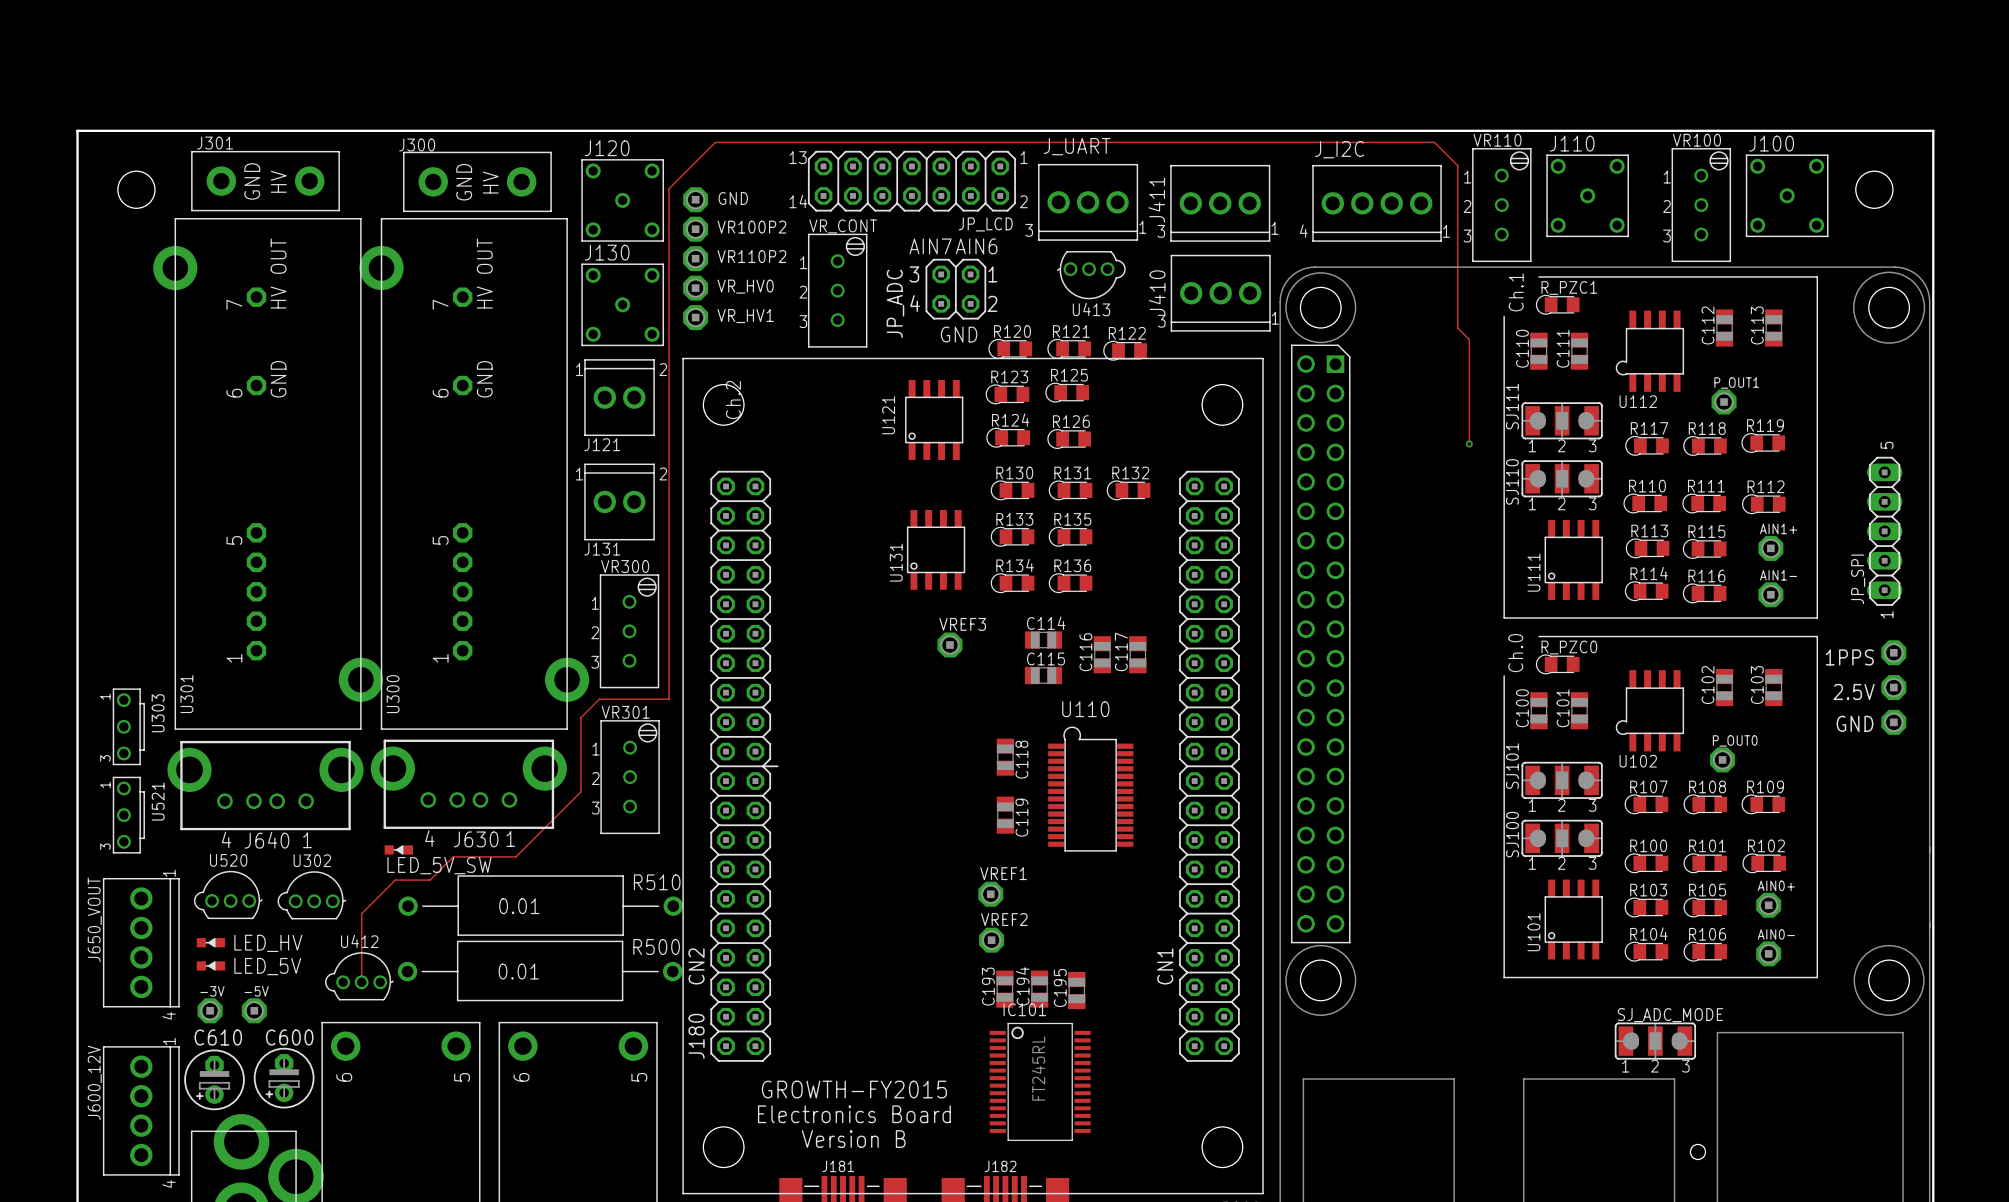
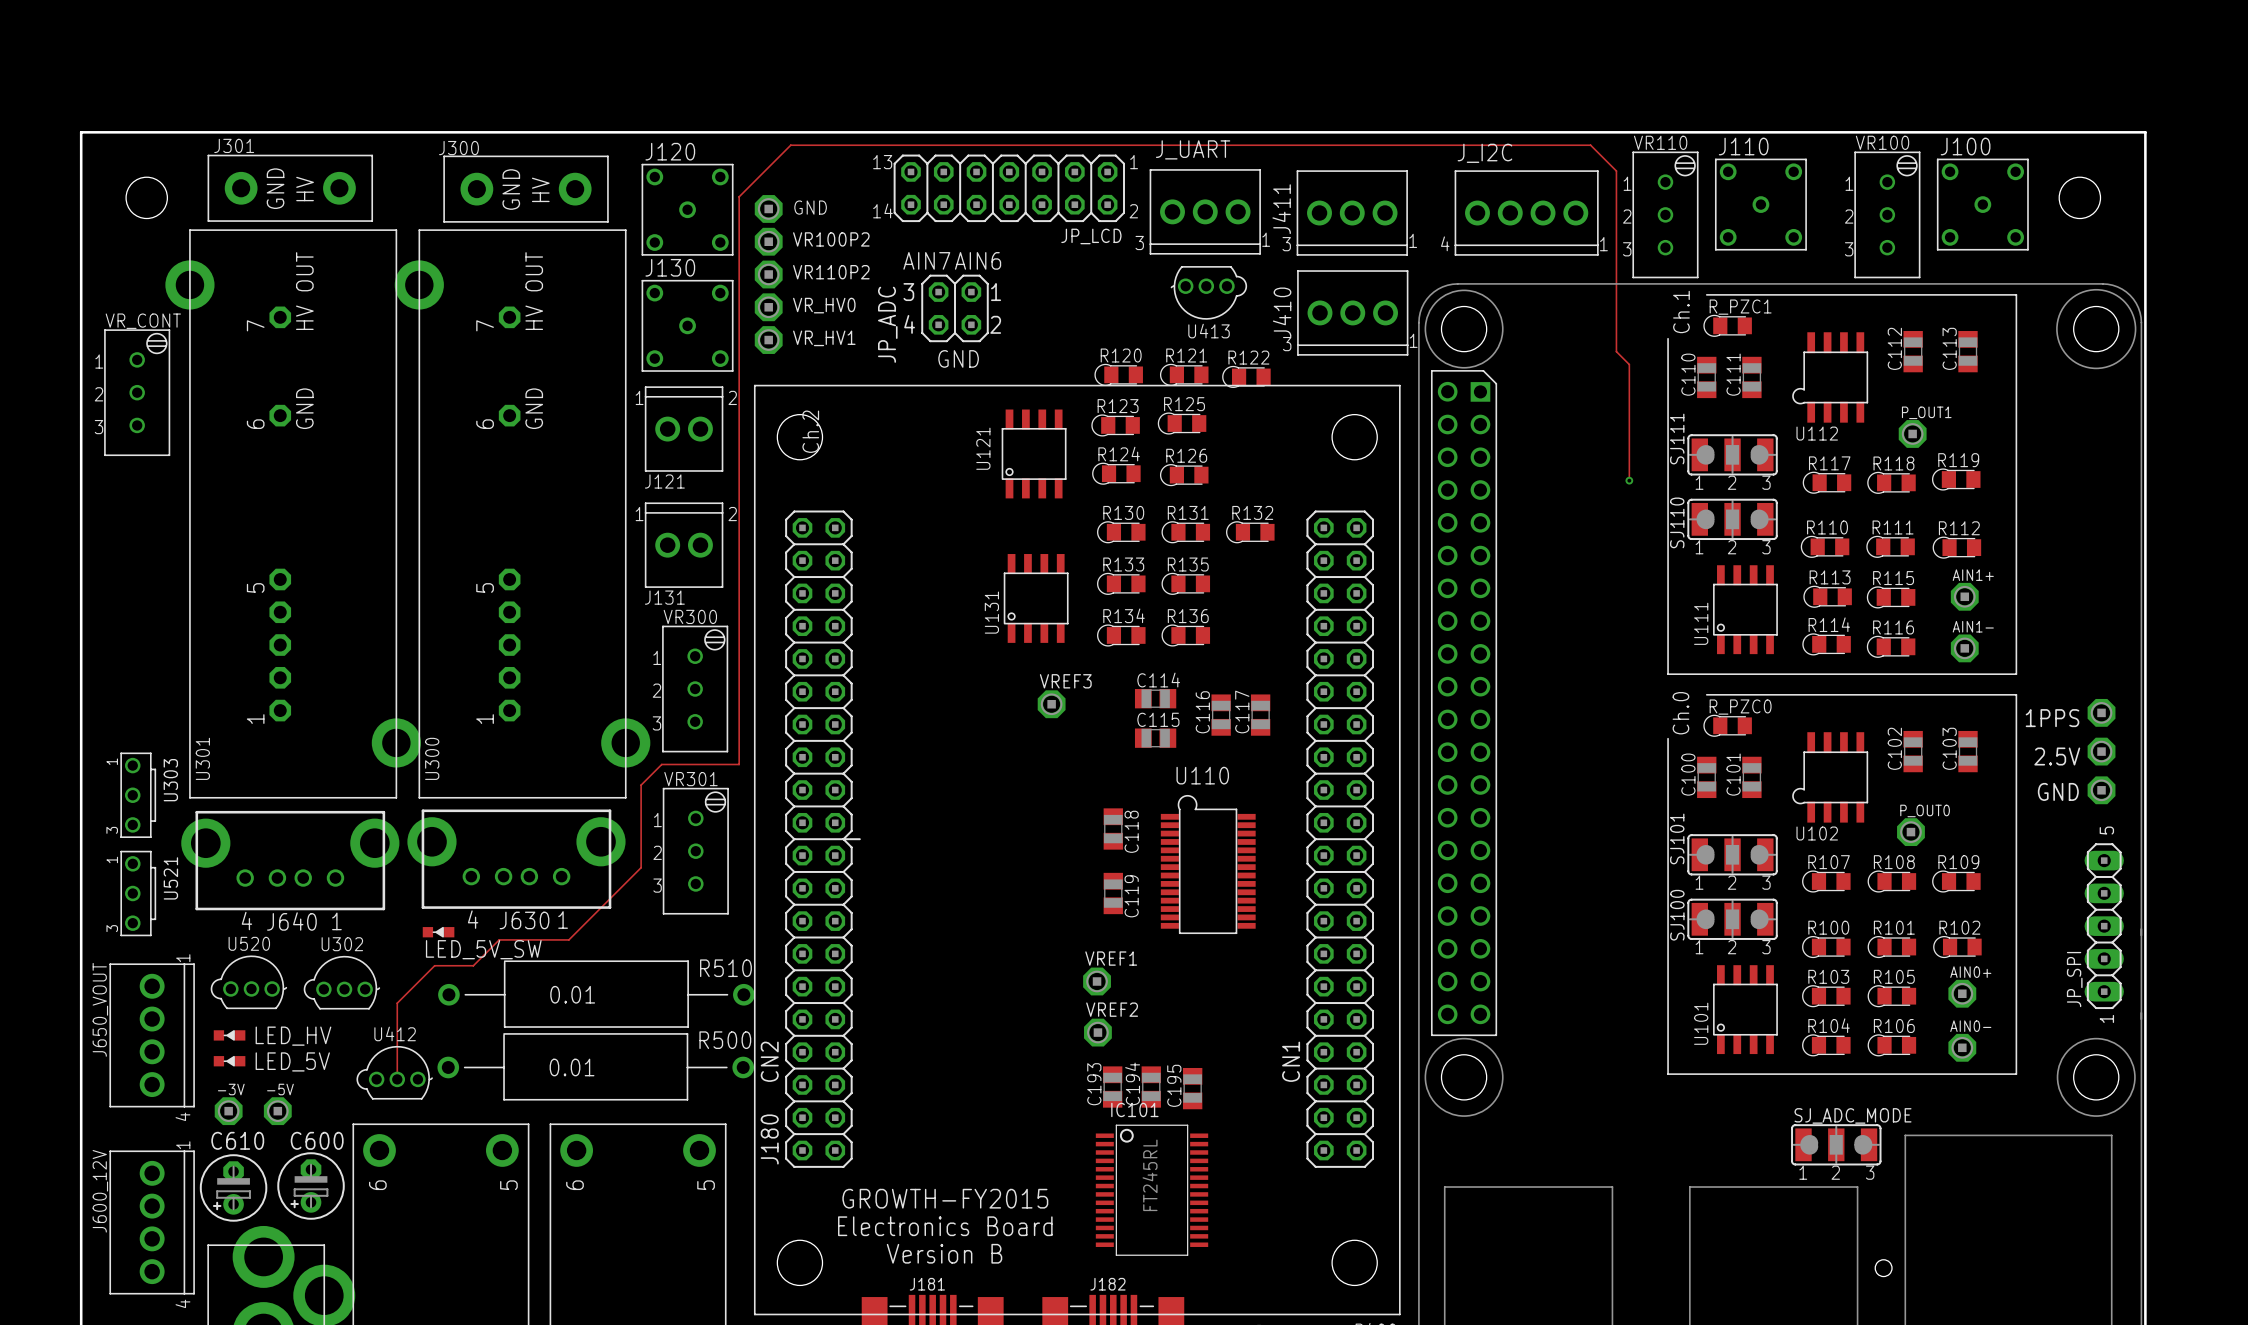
text position: AIN7 (930, 246) -> AIN7 (926, 260)
text position: AIN6 (976, 246) -> AIN6 (978, 260)
JP_ADC position: (955, 289) -> (954, 308)
VR_CONT: (837, 290) -> none
text position: GND (959, 334) -> GND (958, 358)
VR_CONT: none -> (137, 392)
JP_SPI: (1884, 531) -> none
JP_SPI: none -> (2104, 926)

